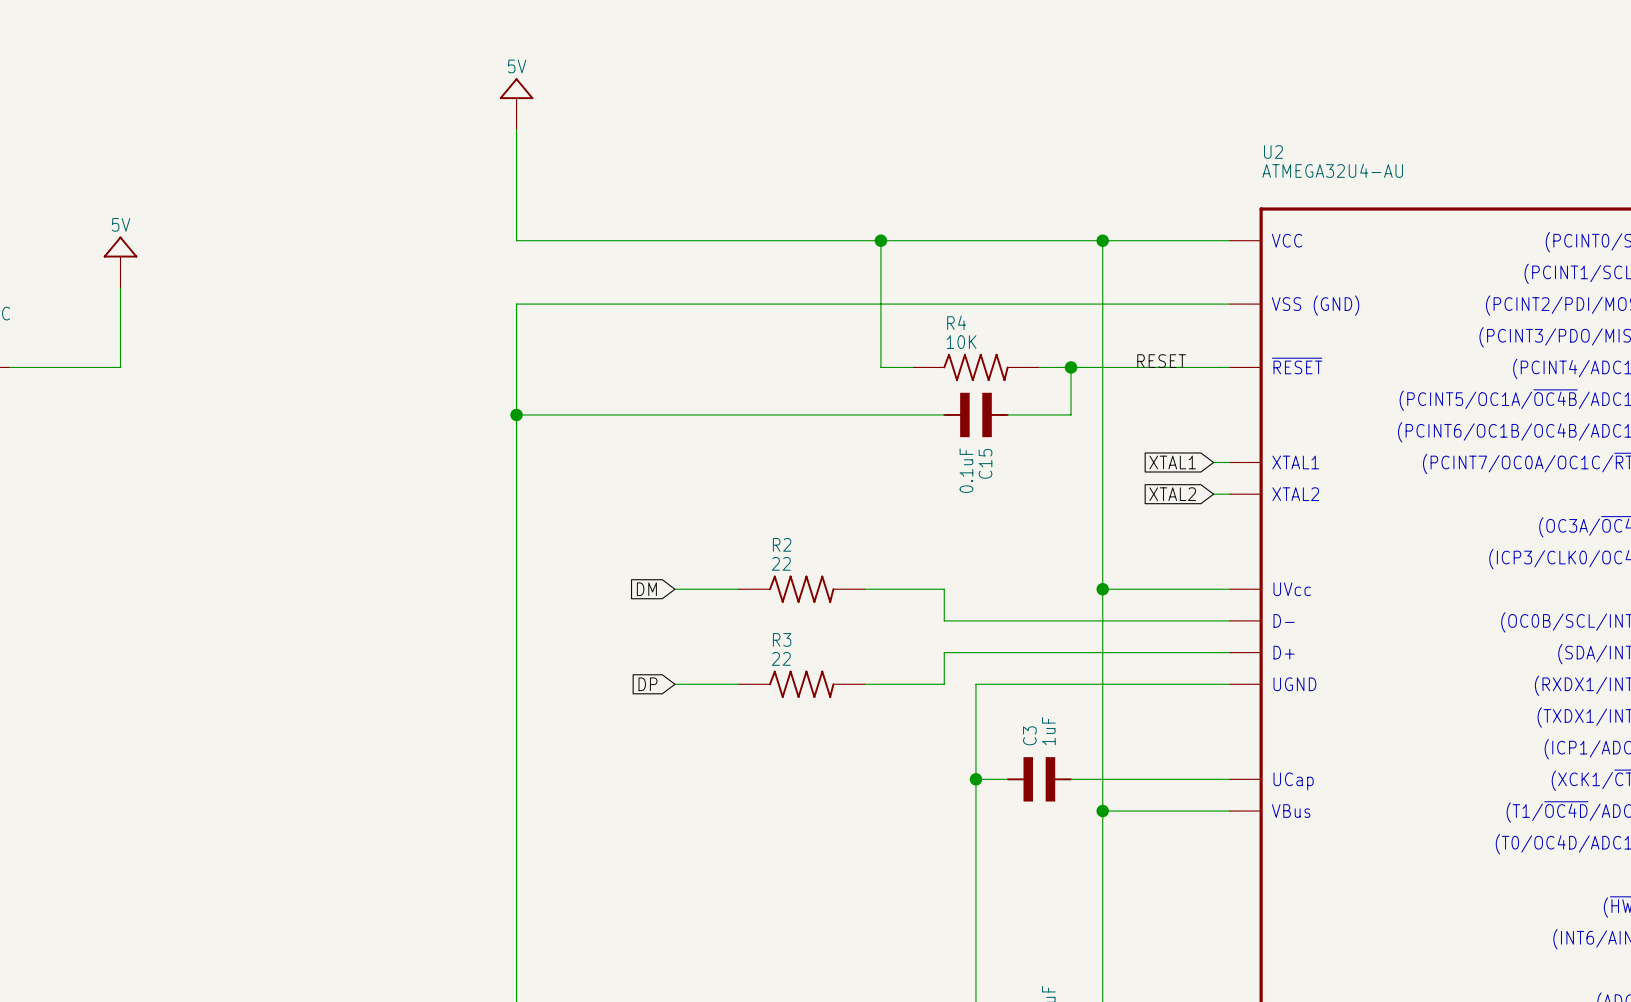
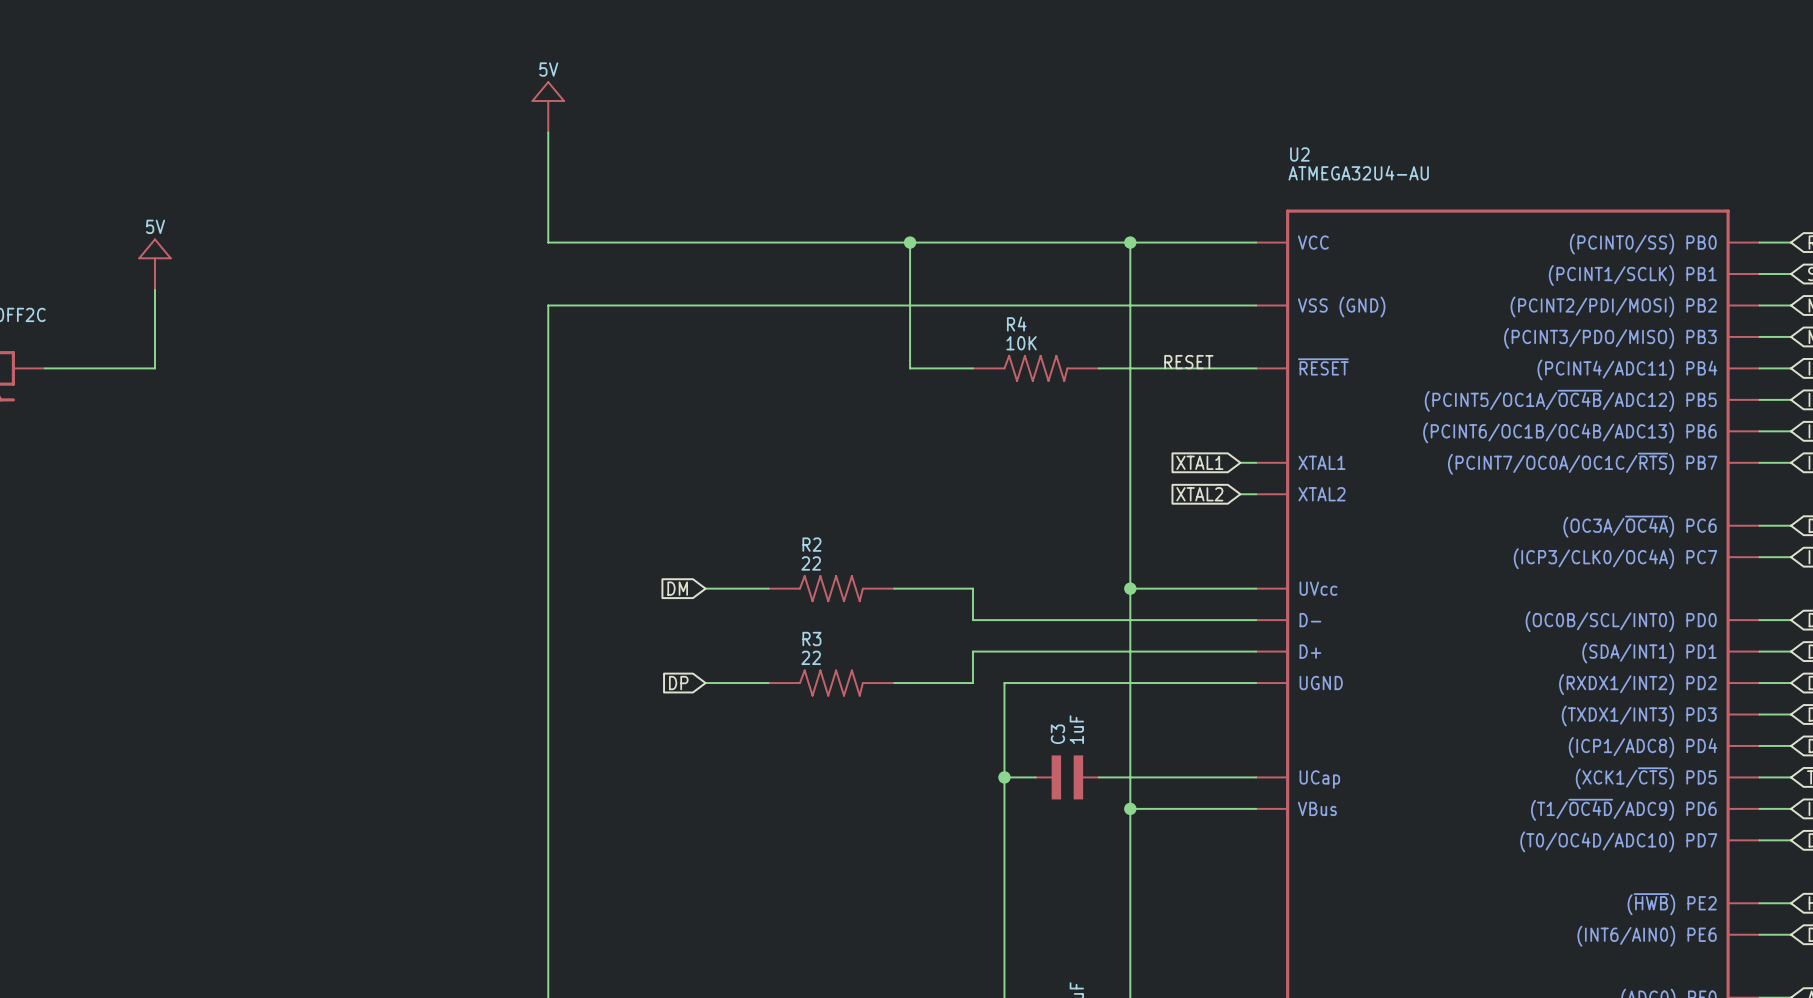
R4 position: (975, 367) -> (1035, 368)
wire: (1039, 367) (1071, 367) (1071, 414) (1007, 414) -> none
junction: (1071, 367) -> none
wire: (516, 414) (944, 414) -> none
junction: (516, 414) -> none
C15: 0.1uF (975, 414) -> none

